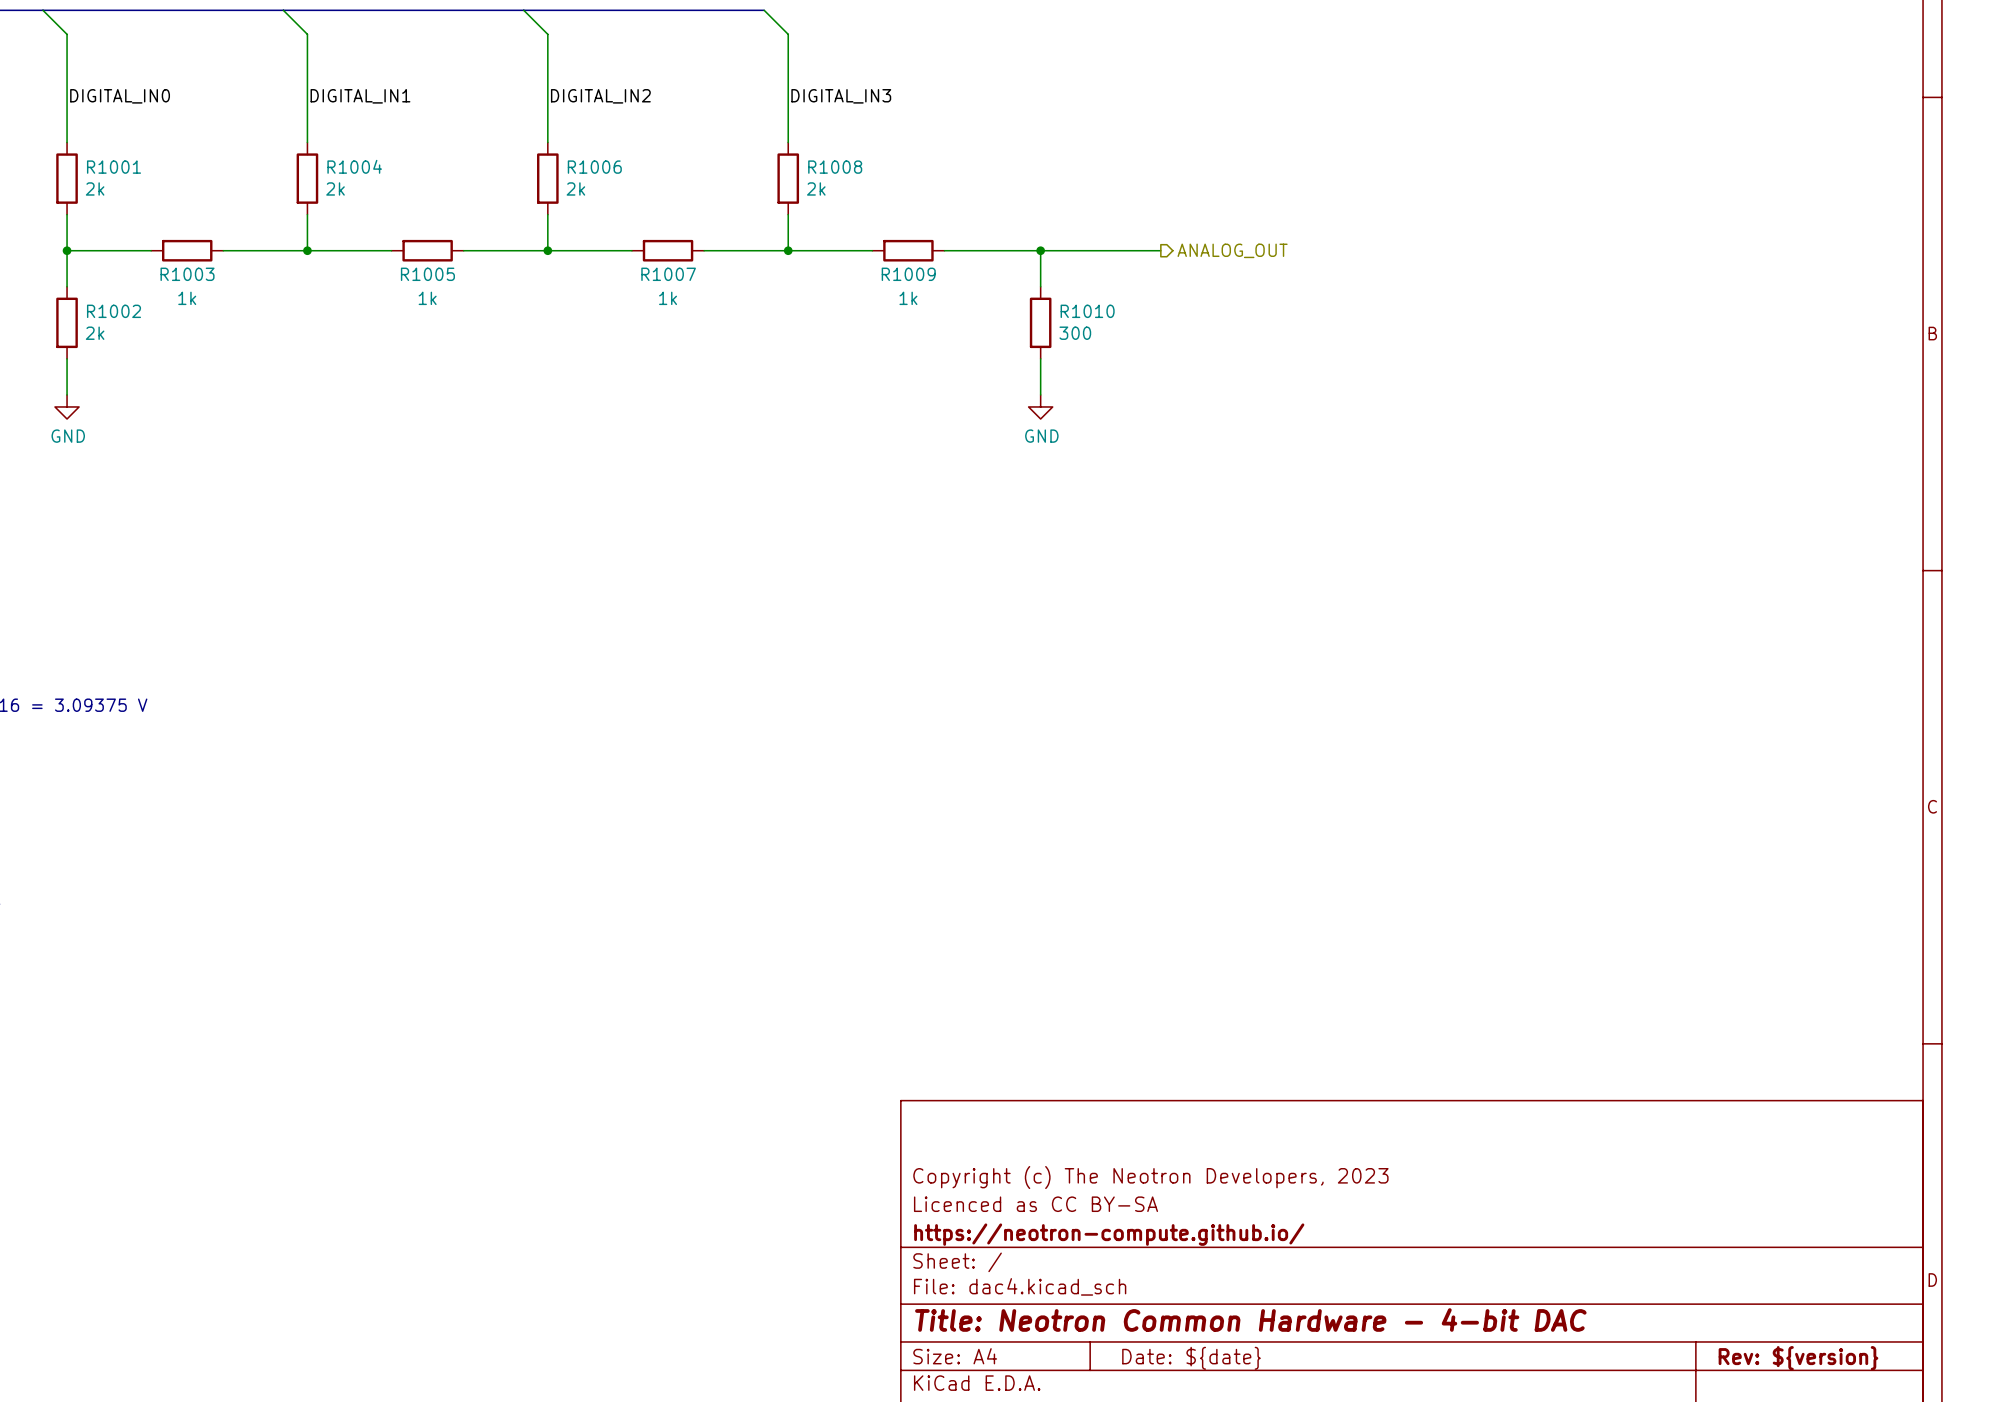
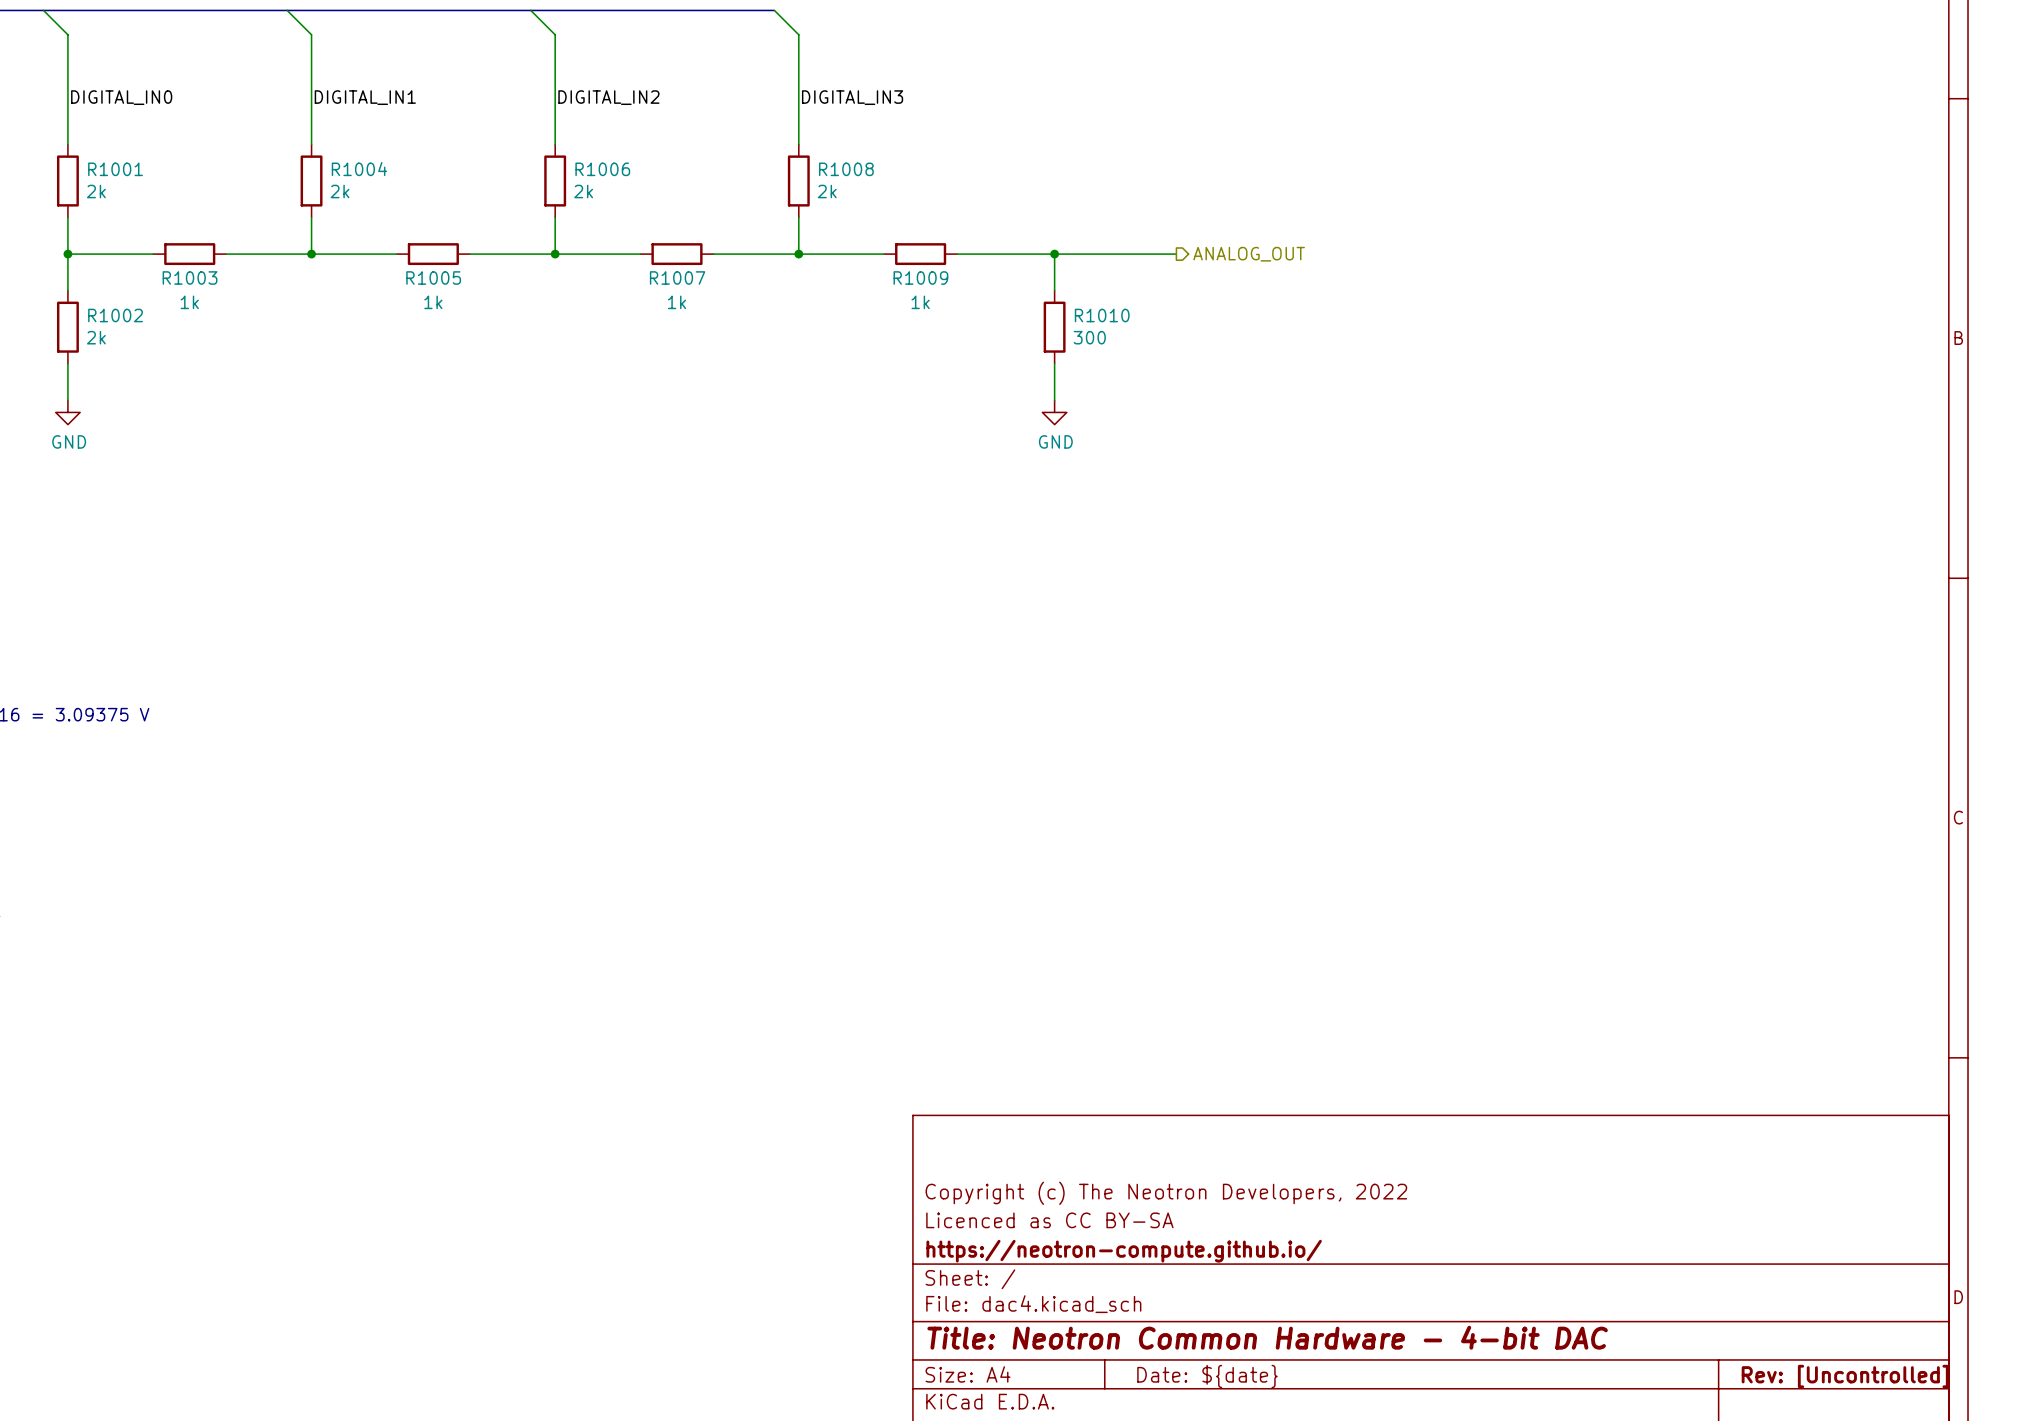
title block: Copyright (c) The Neotron Developers, 2023 (1150, 1177) -> Copyright (c) The Neotron Developers, 2022 (1166, 1193)
title block: Rev: ${version} (1798, 1358) -> Rev: [Uncontrolled] (1845, 1376)

